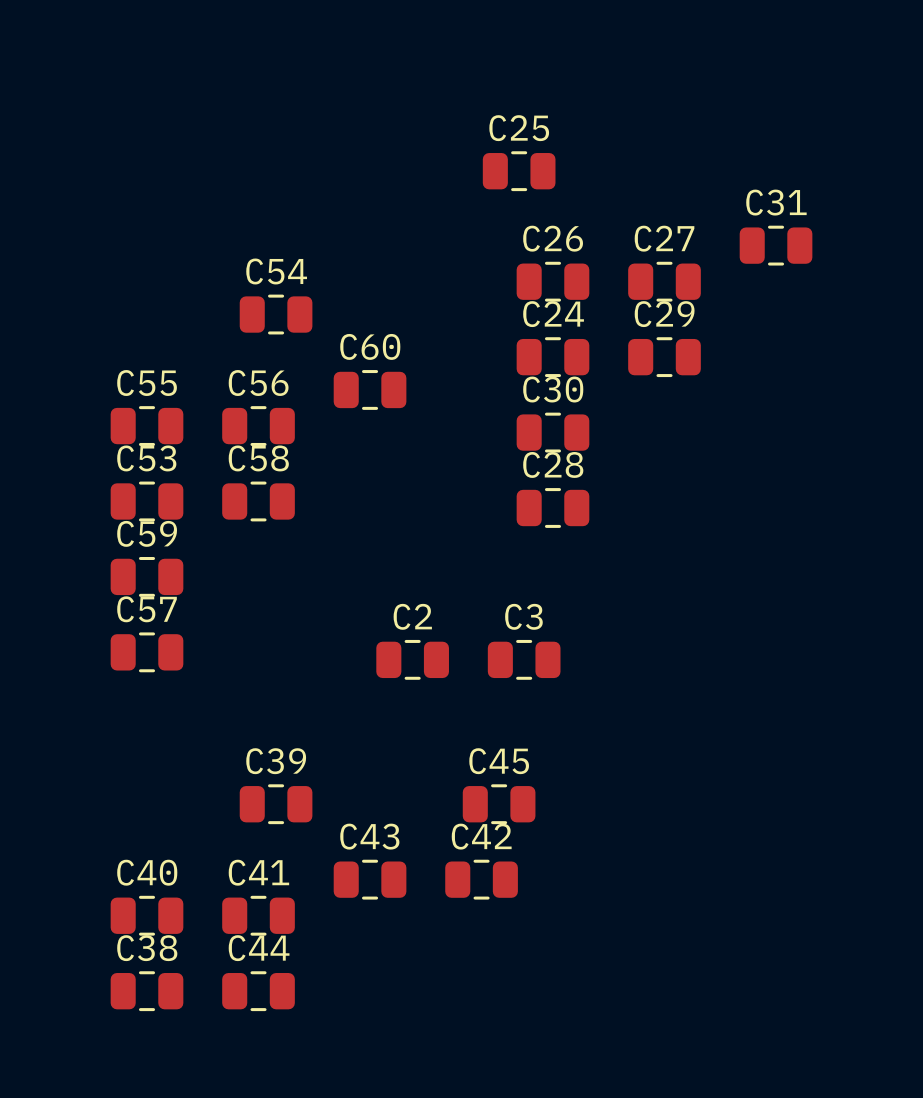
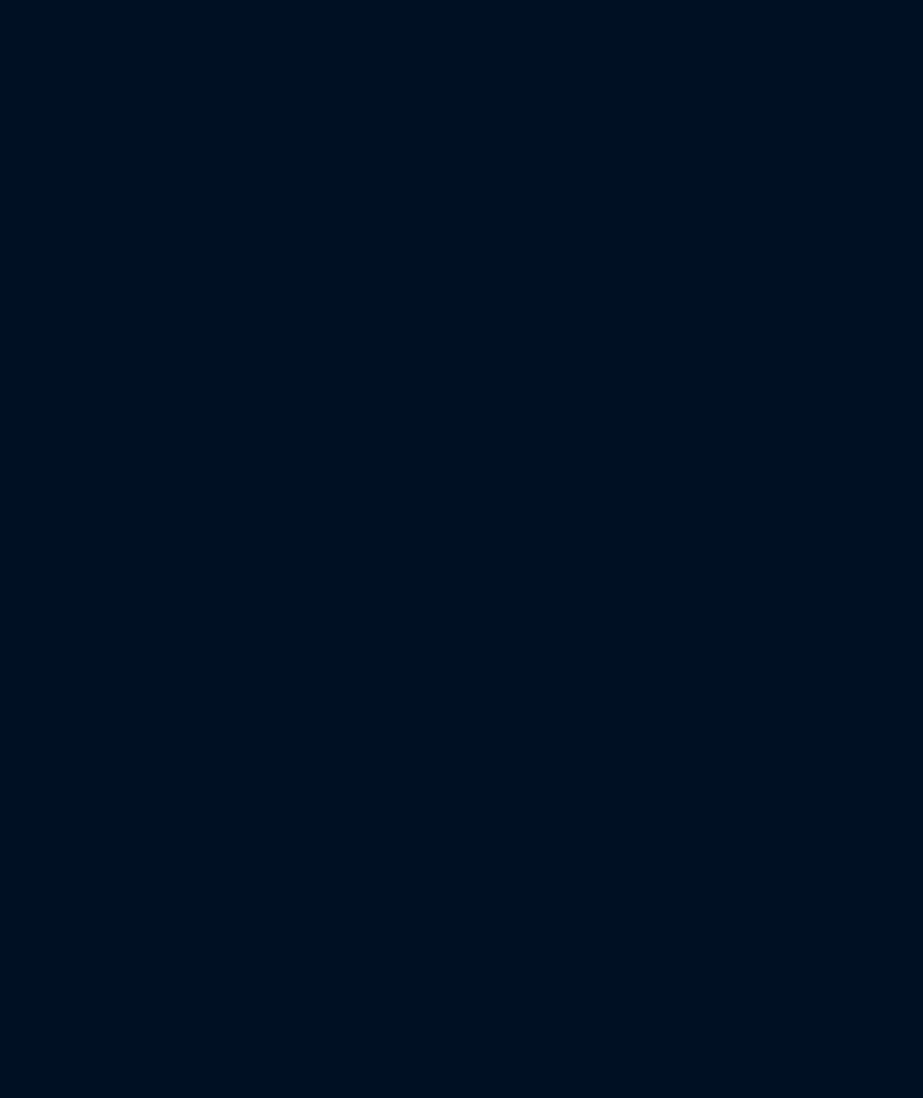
C25: (519, 171) -> none
C31: (776, 245) -> none
C26: (552, 281) -> none
C27: (664, 281) -> none
C54: (276, 314) -> none
C24: (552, 357) -> none
C29: (664, 357) -> none
C60: (370, 389) -> none
C55: (147, 426) -> none
C56: (258, 426) -> none
C30: (552, 432) -> none
C53: (147, 501) -> none
C58: (258, 501) -> none
C28: (552, 508) -> none
C59: (147, 576) -> none
C57: (147, 652) -> none
C2: (412, 659) -> none
C3: (524, 659) -> none
C39: (276, 804) -> none
C45: (499, 804) -> none
C43: (370, 879) -> none
C42: (481, 879) -> none
C40: (147, 915) -> none
C41: (258, 915) -> none
C38: (147, 991) -> none
C44: (258, 991) -> none

